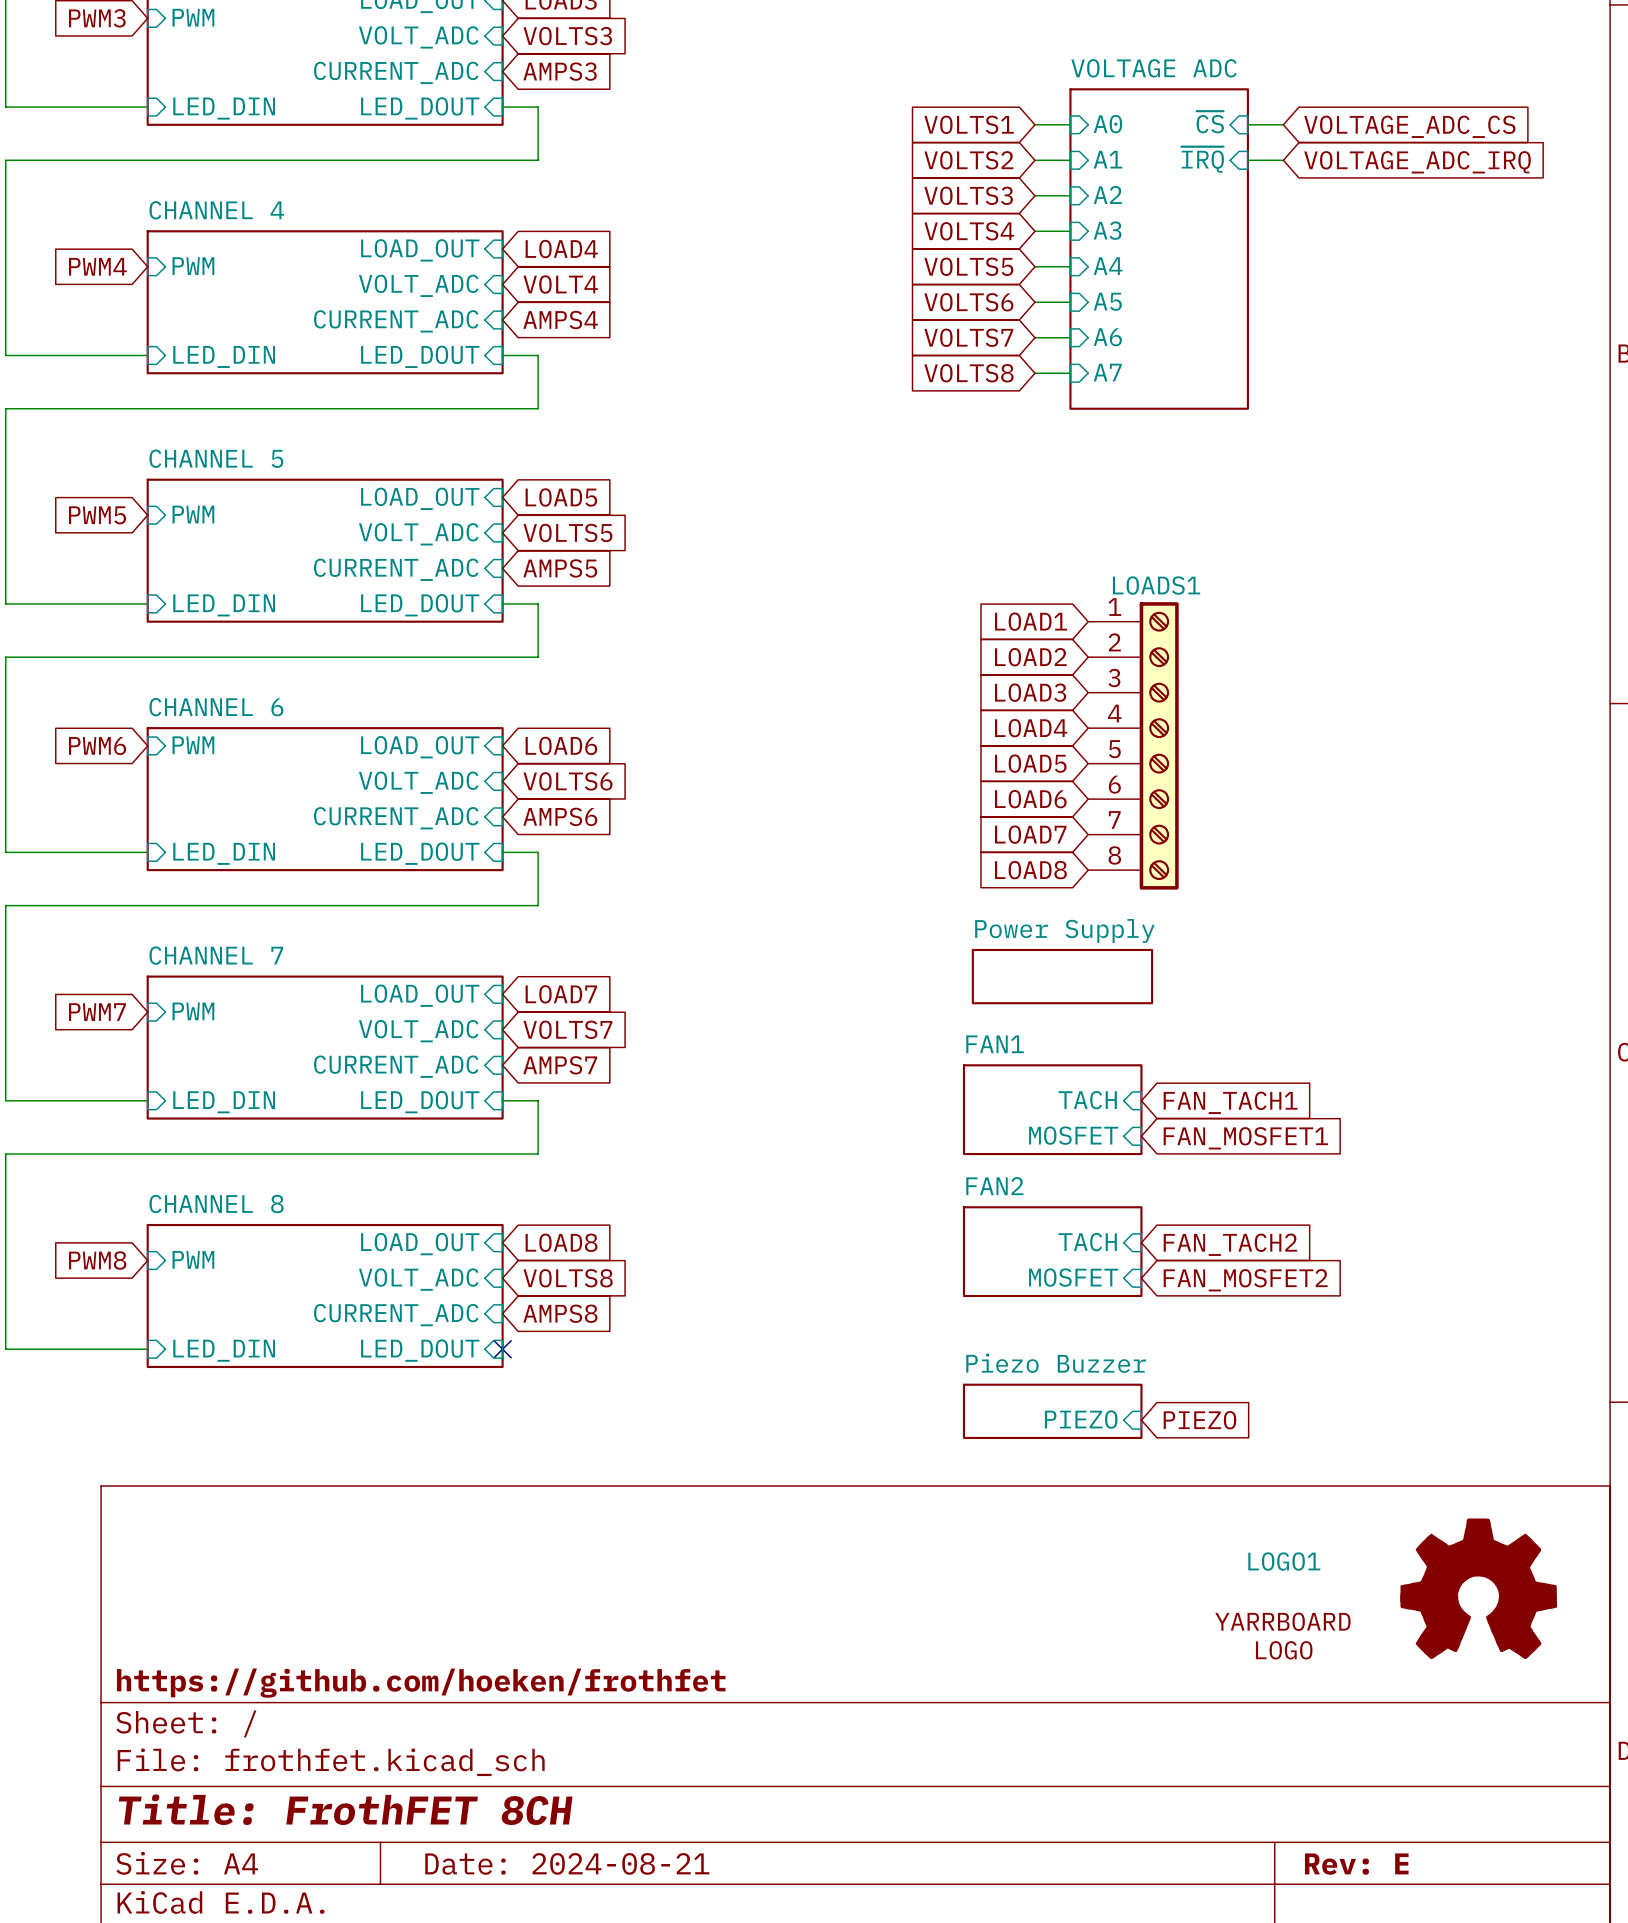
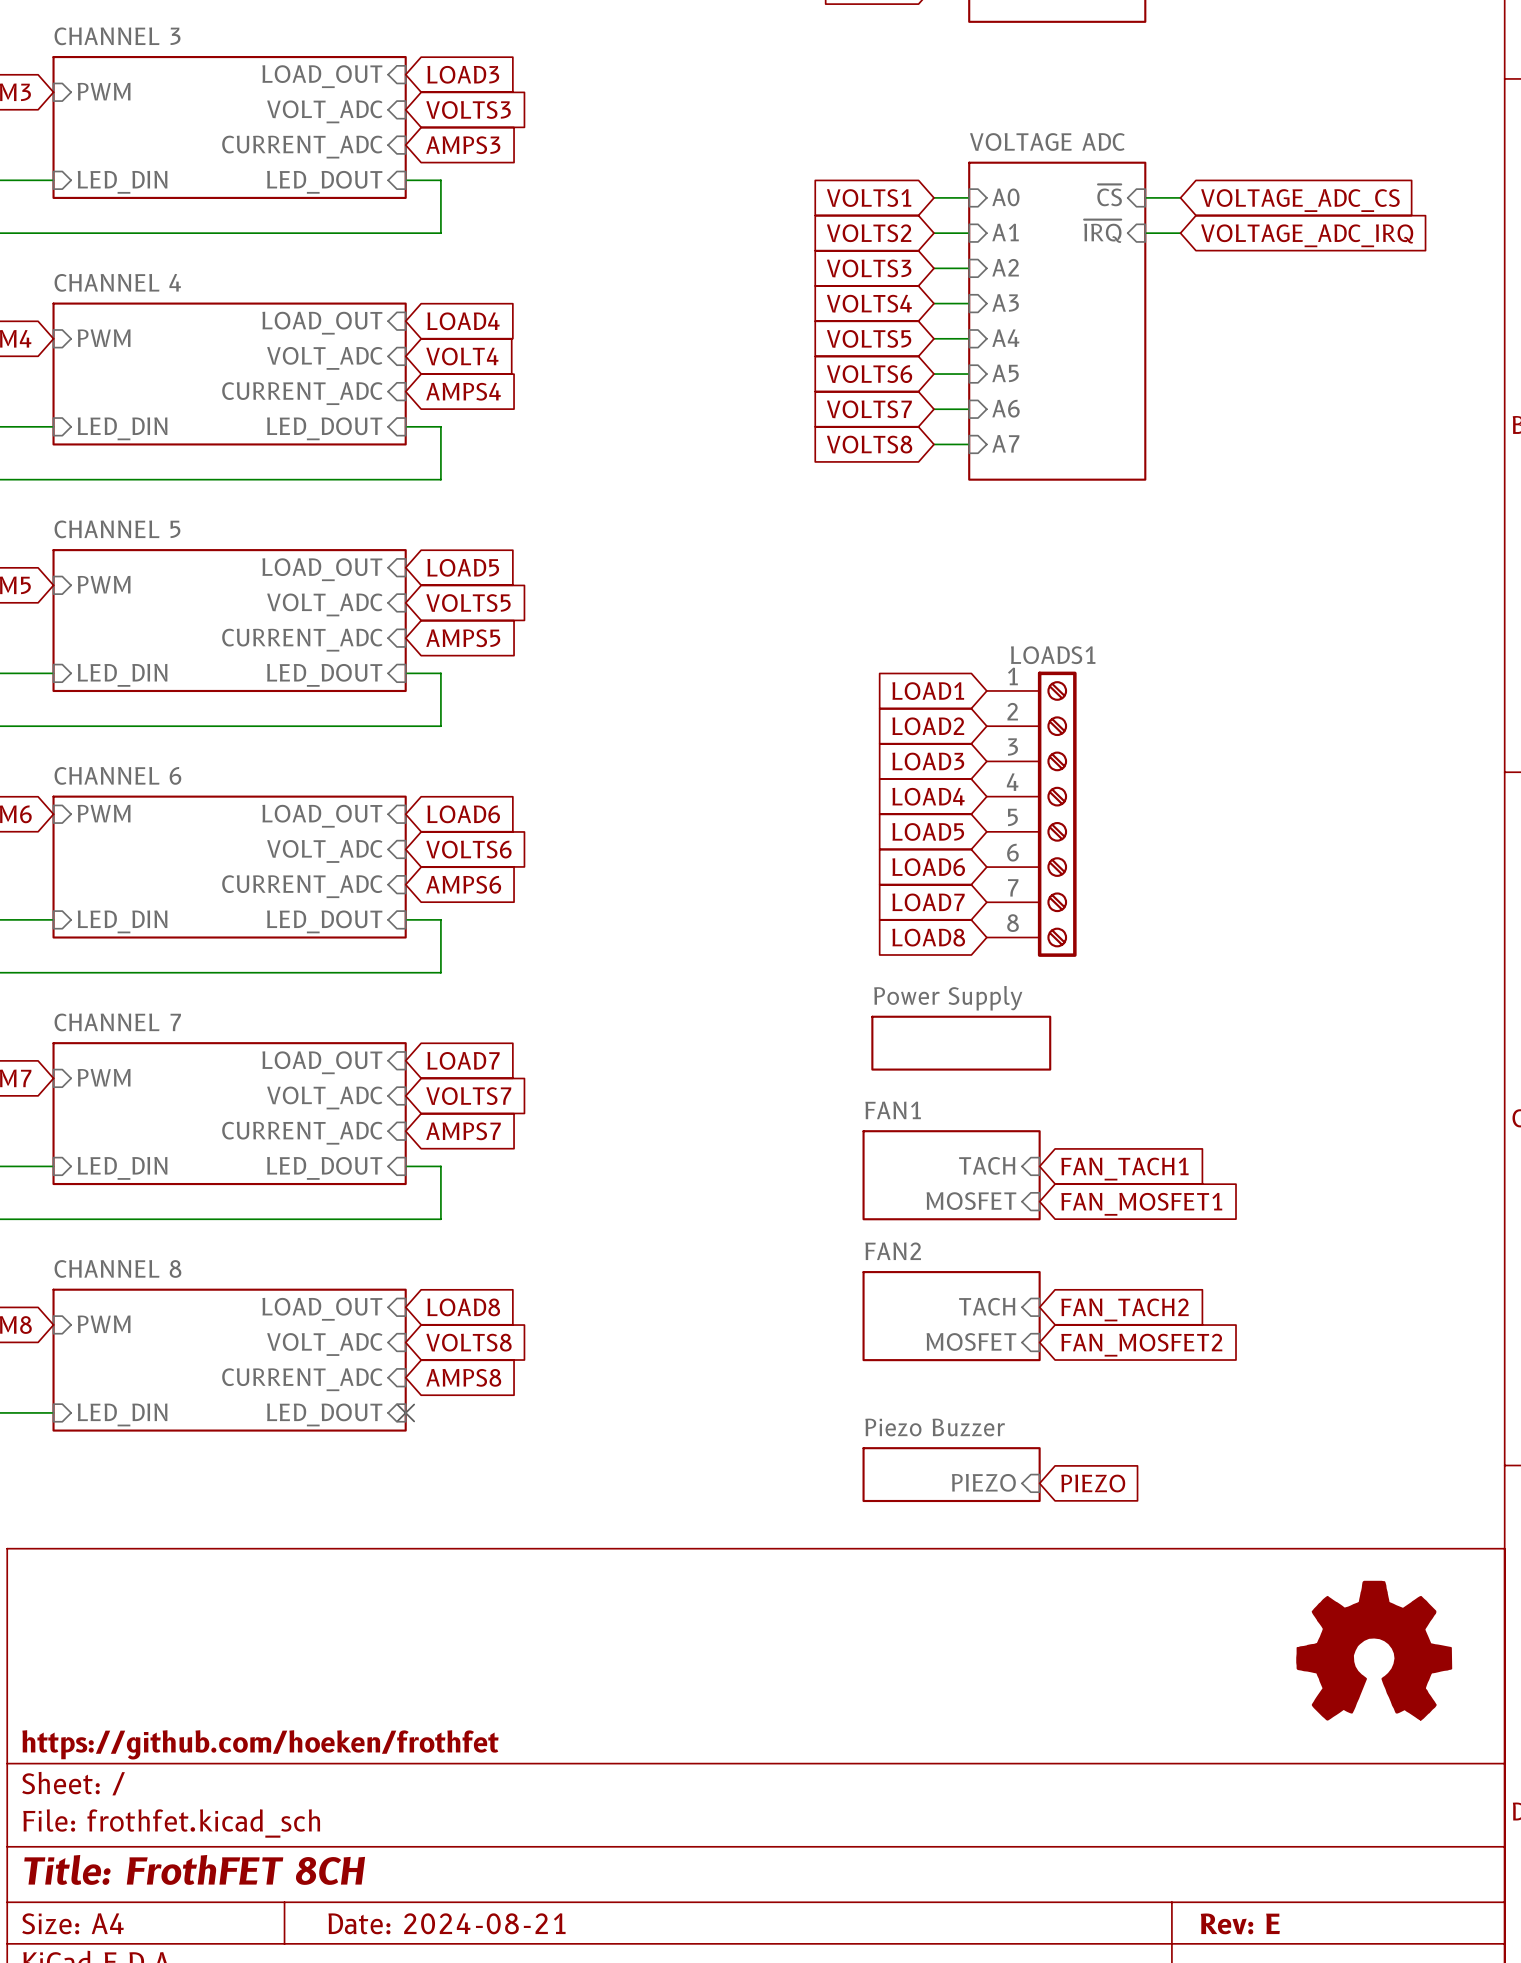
LOGO1: (1282, 1605) -> none

